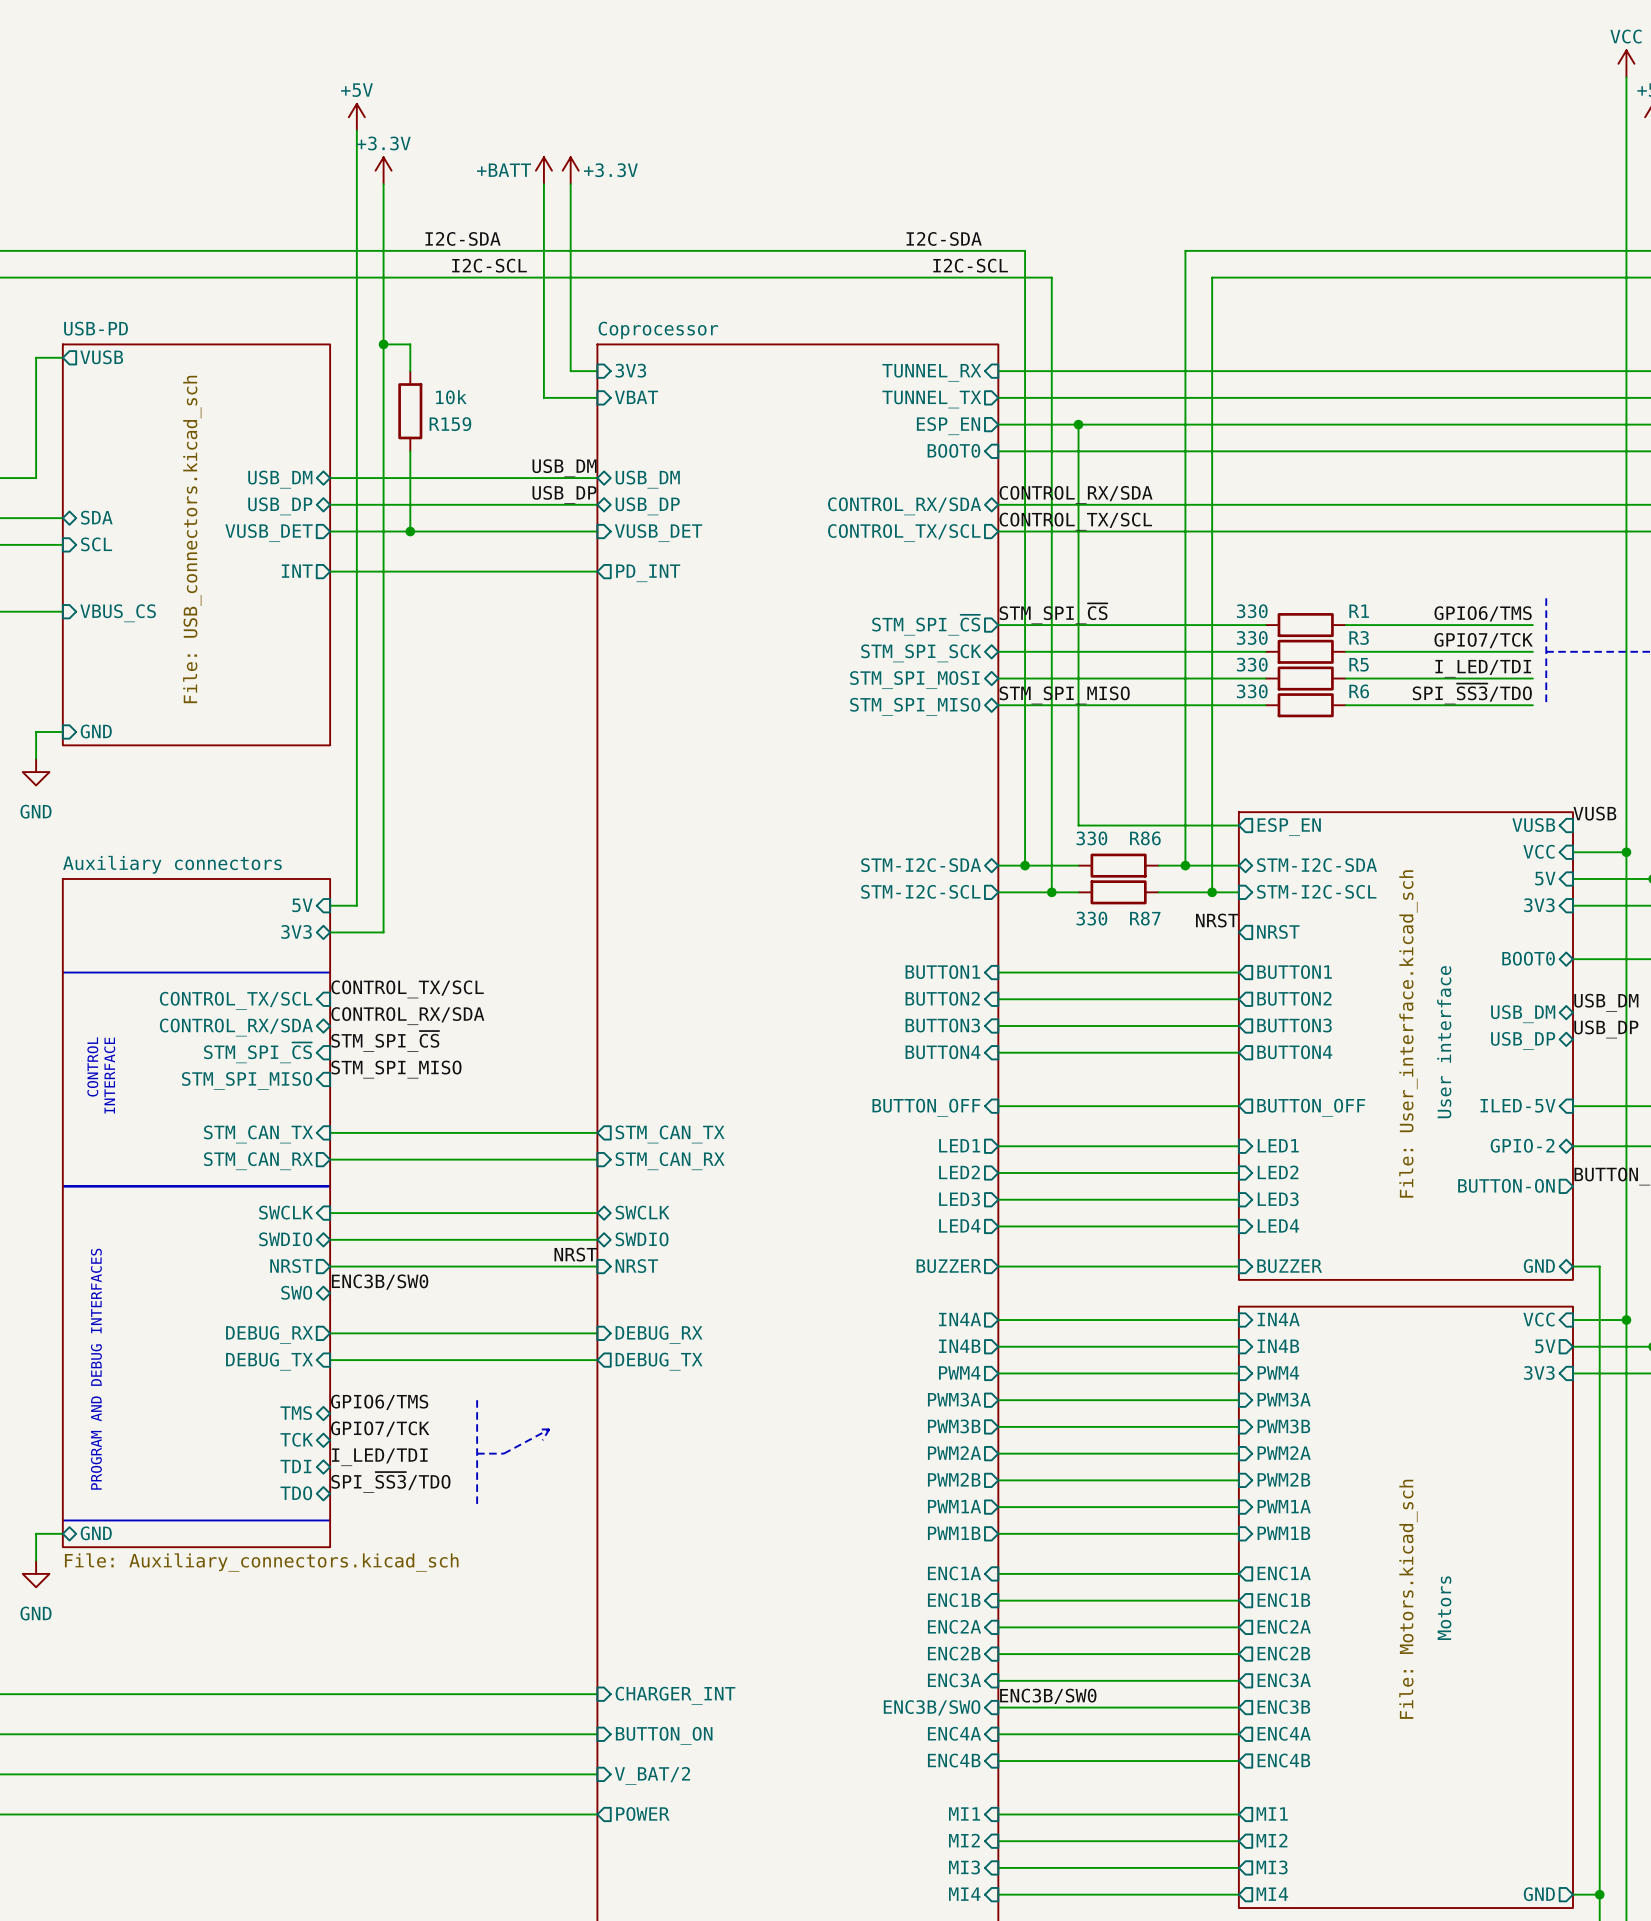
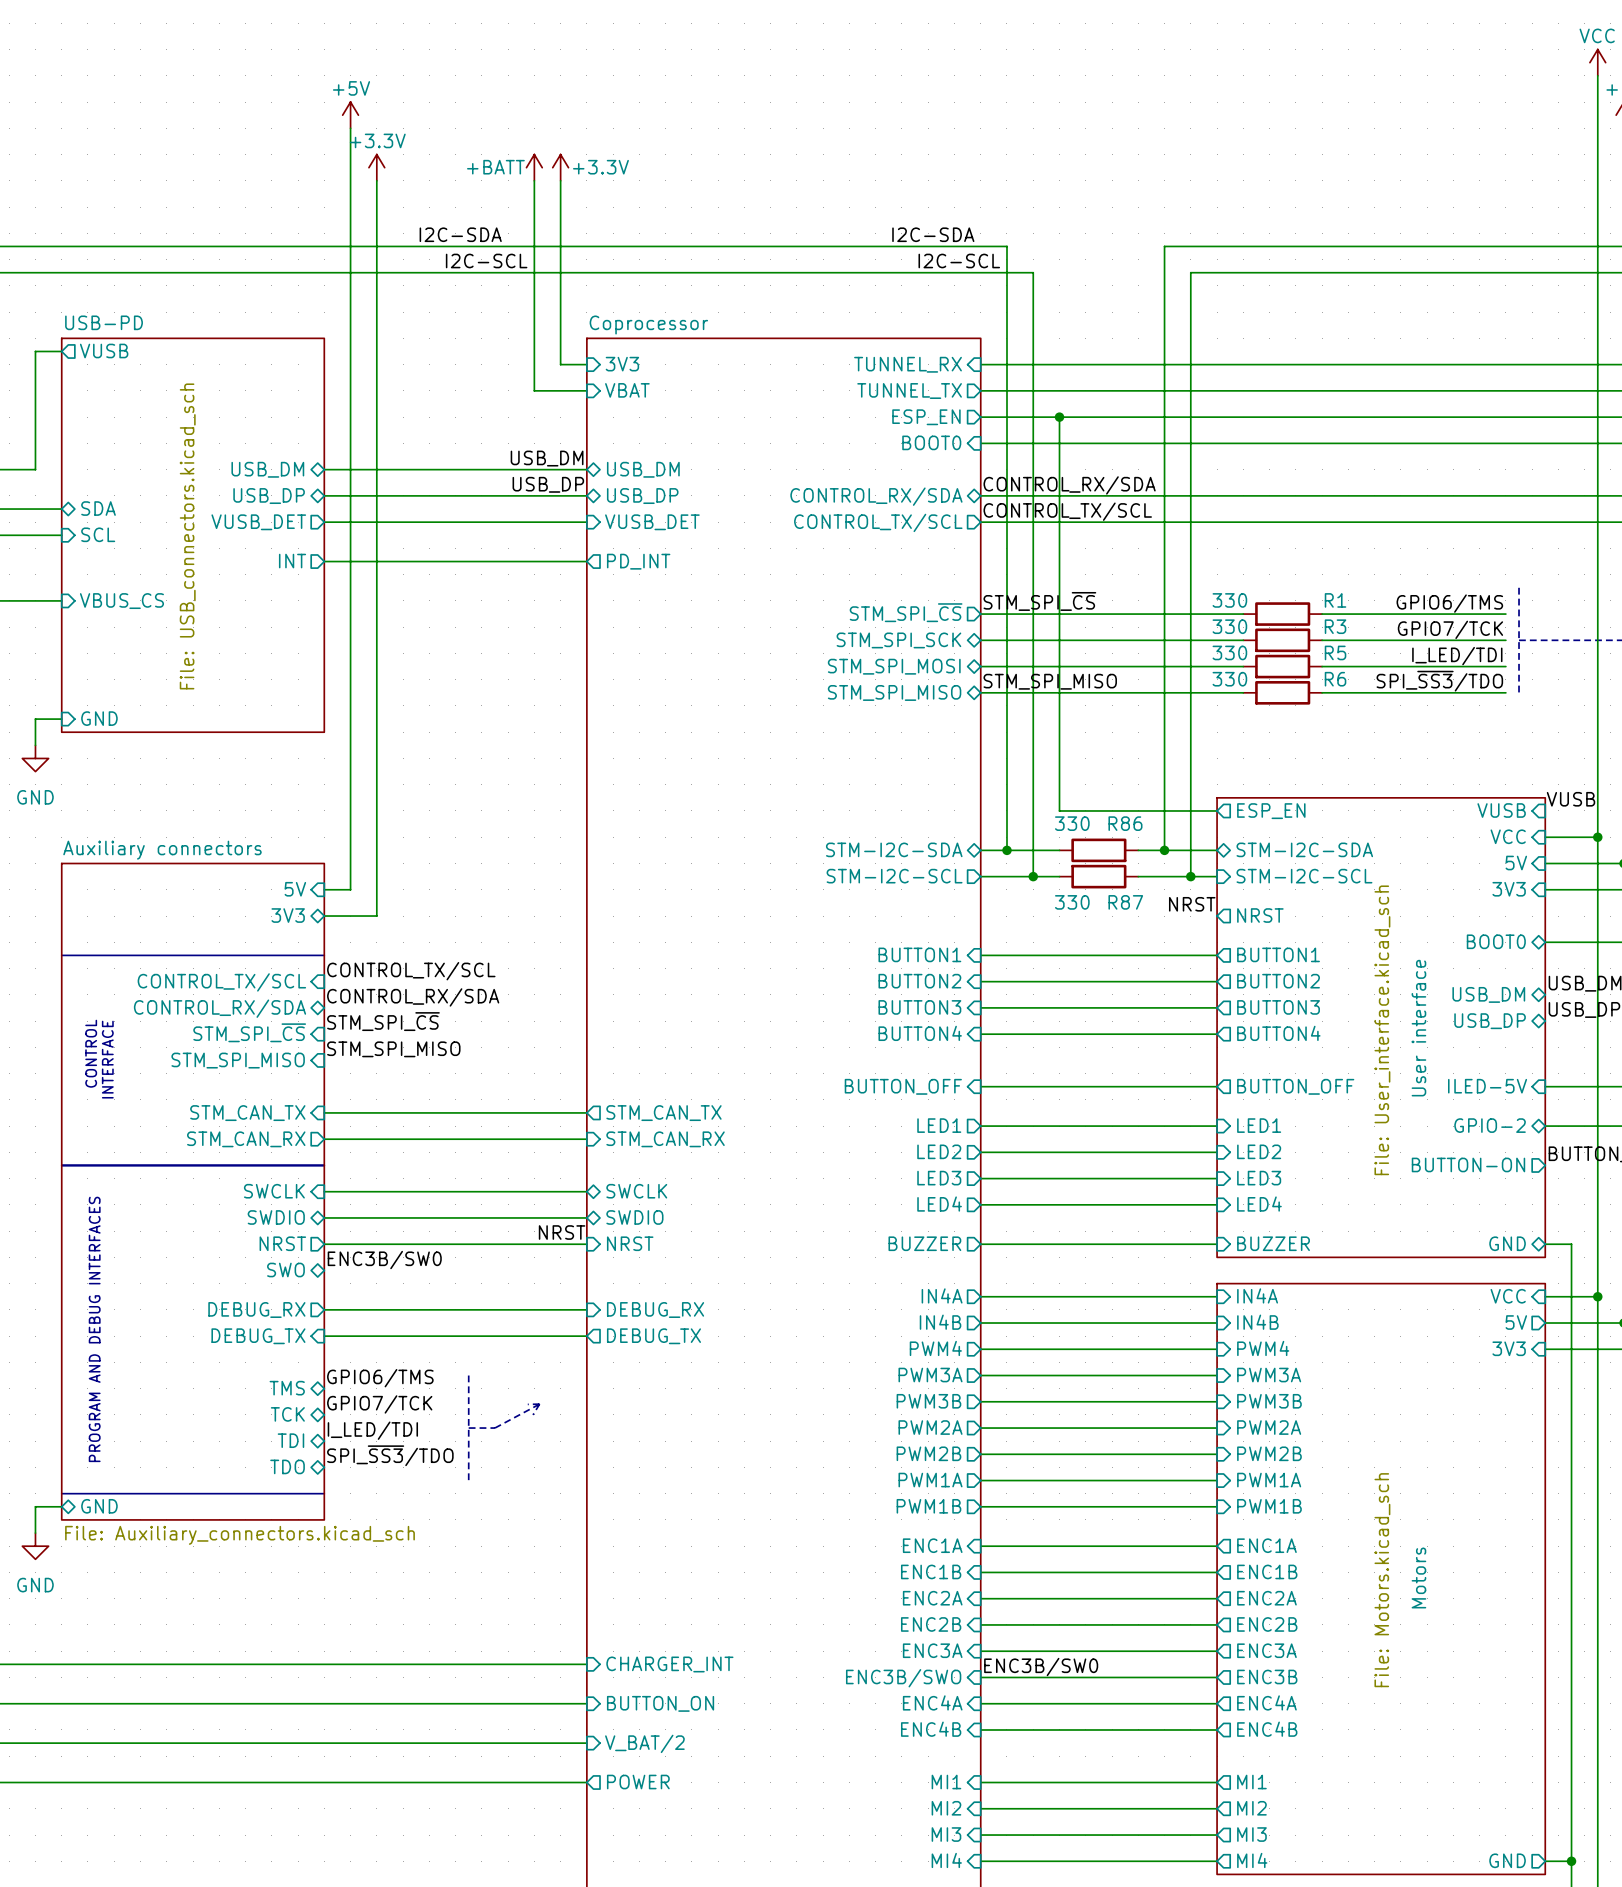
wire: (383, 344) (410, 344) (410, 371) -> none
junction: (383, 344) -> none
R159: 10k (410, 411) -> none
wire: (410, 451) (410, 531) -> none
junction: (410, 531) -> none

